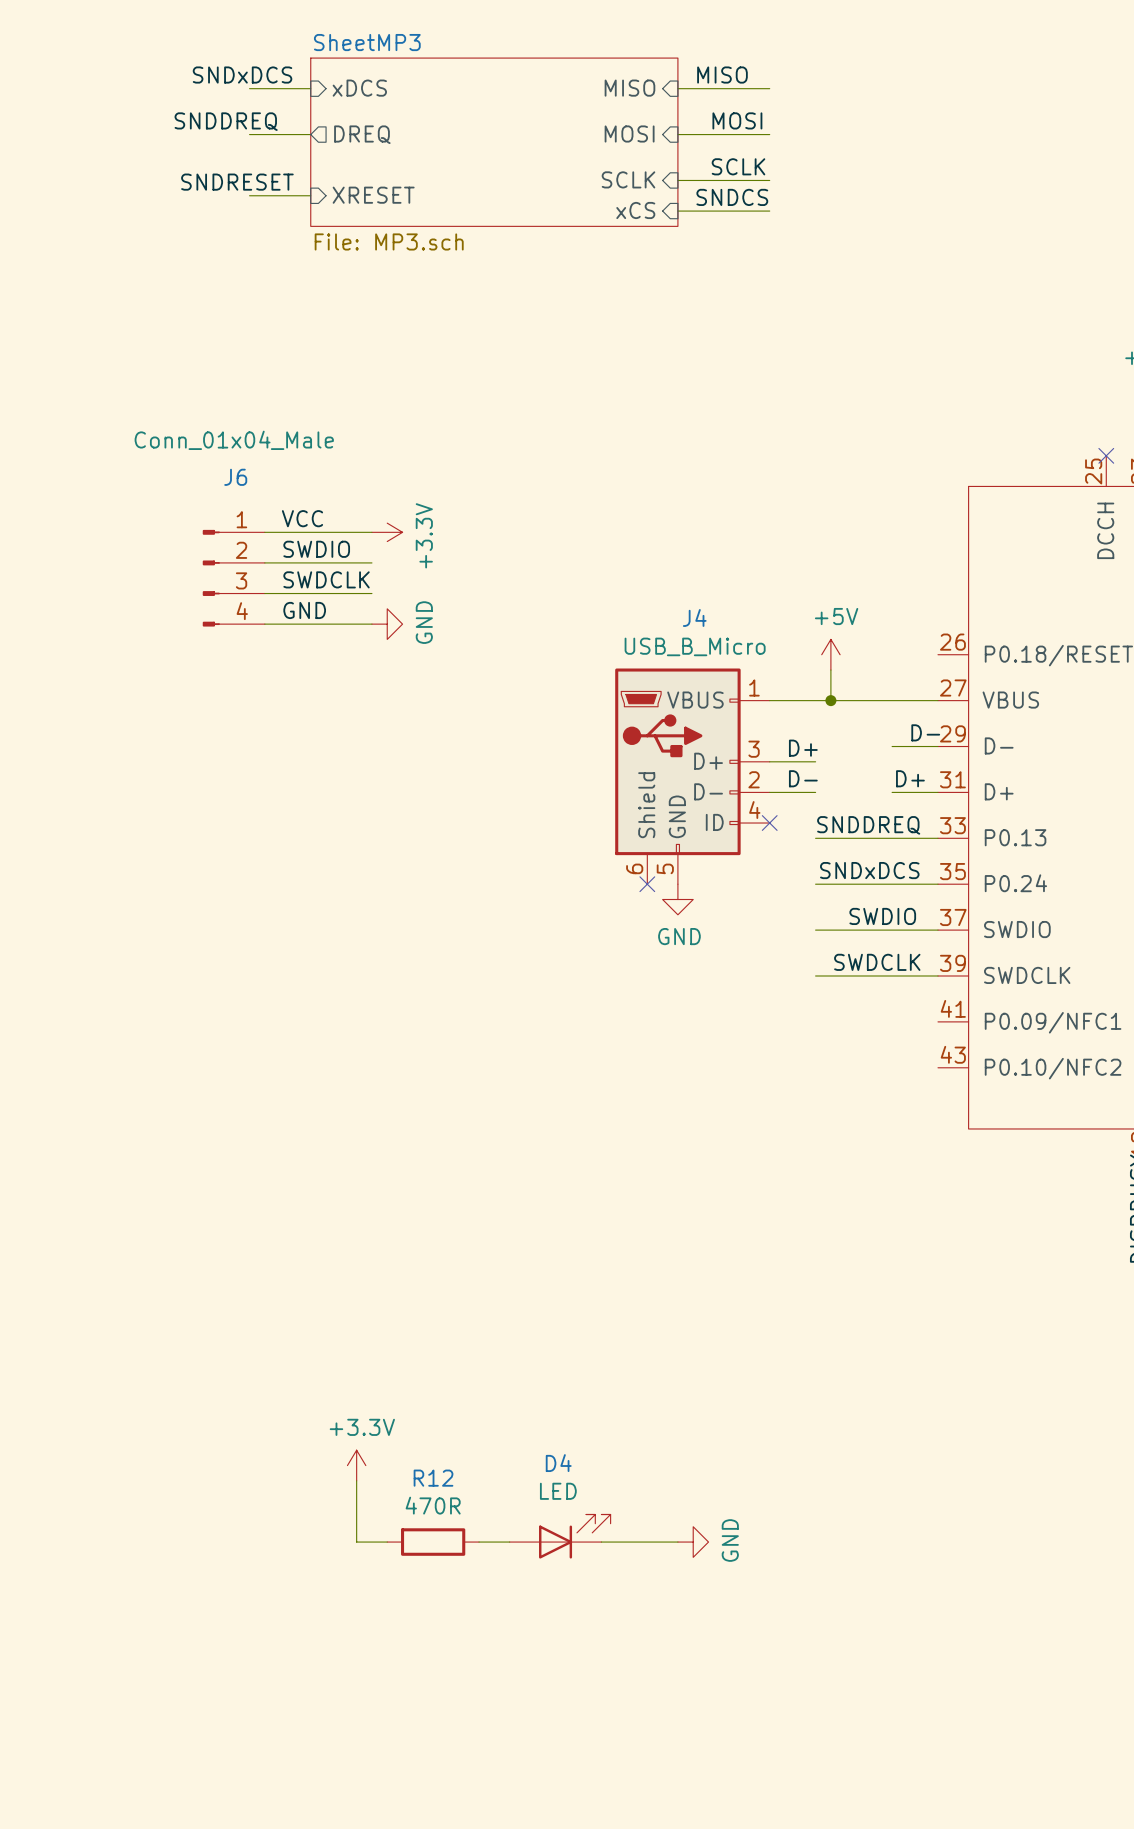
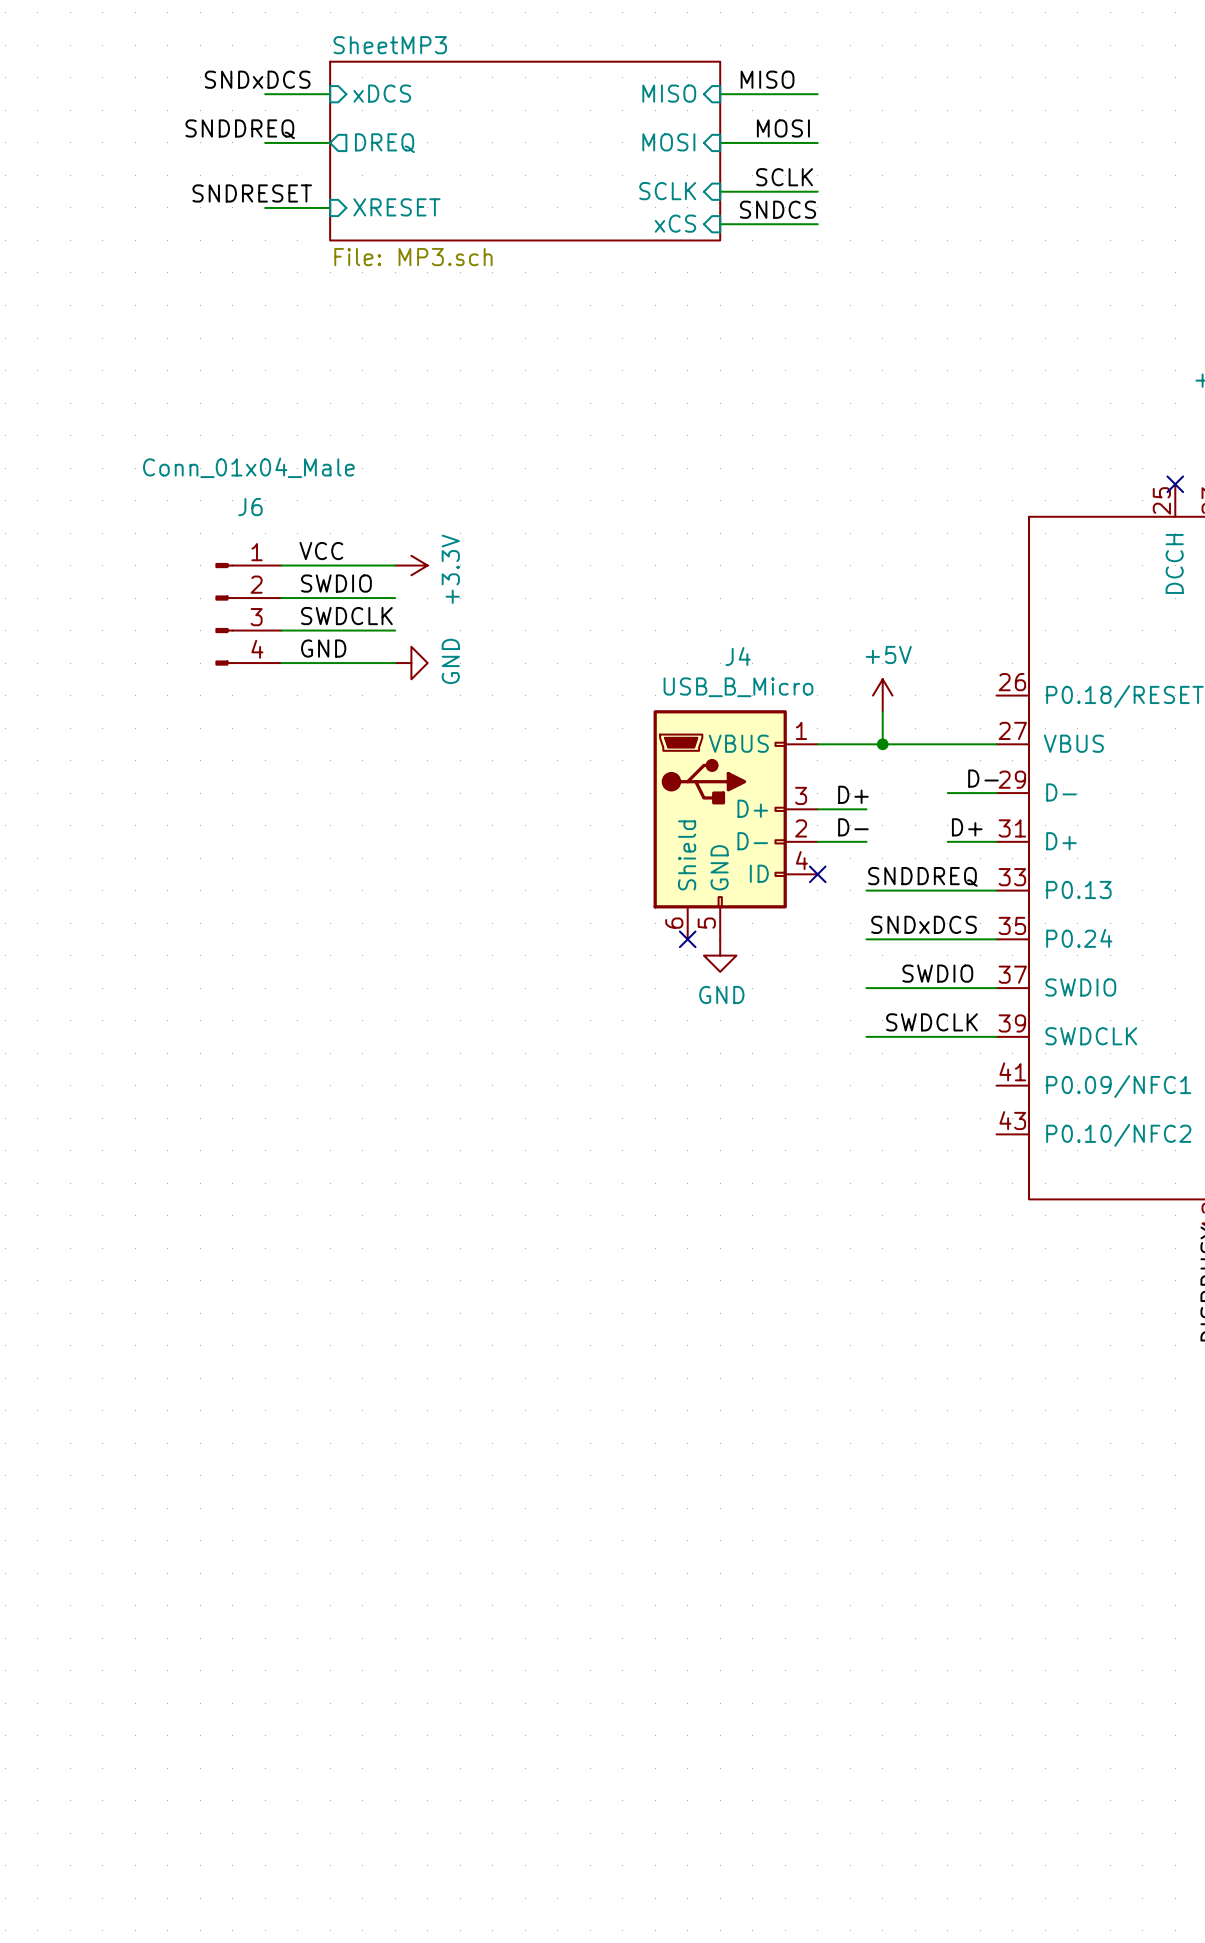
power symbol: +3.3V (356, 1465) -> none
wire: (356, 1480) (356, 1542) (387, 1542) -> none
D4: LED (560, 1536) -> none
R12: 470R (433, 1542) -> none
wire: (479, 1542) (509, 1542) -> none
wire: (601, 1542) (677, 1542) -> none
power symbol: GND (693, 1542) -> none

